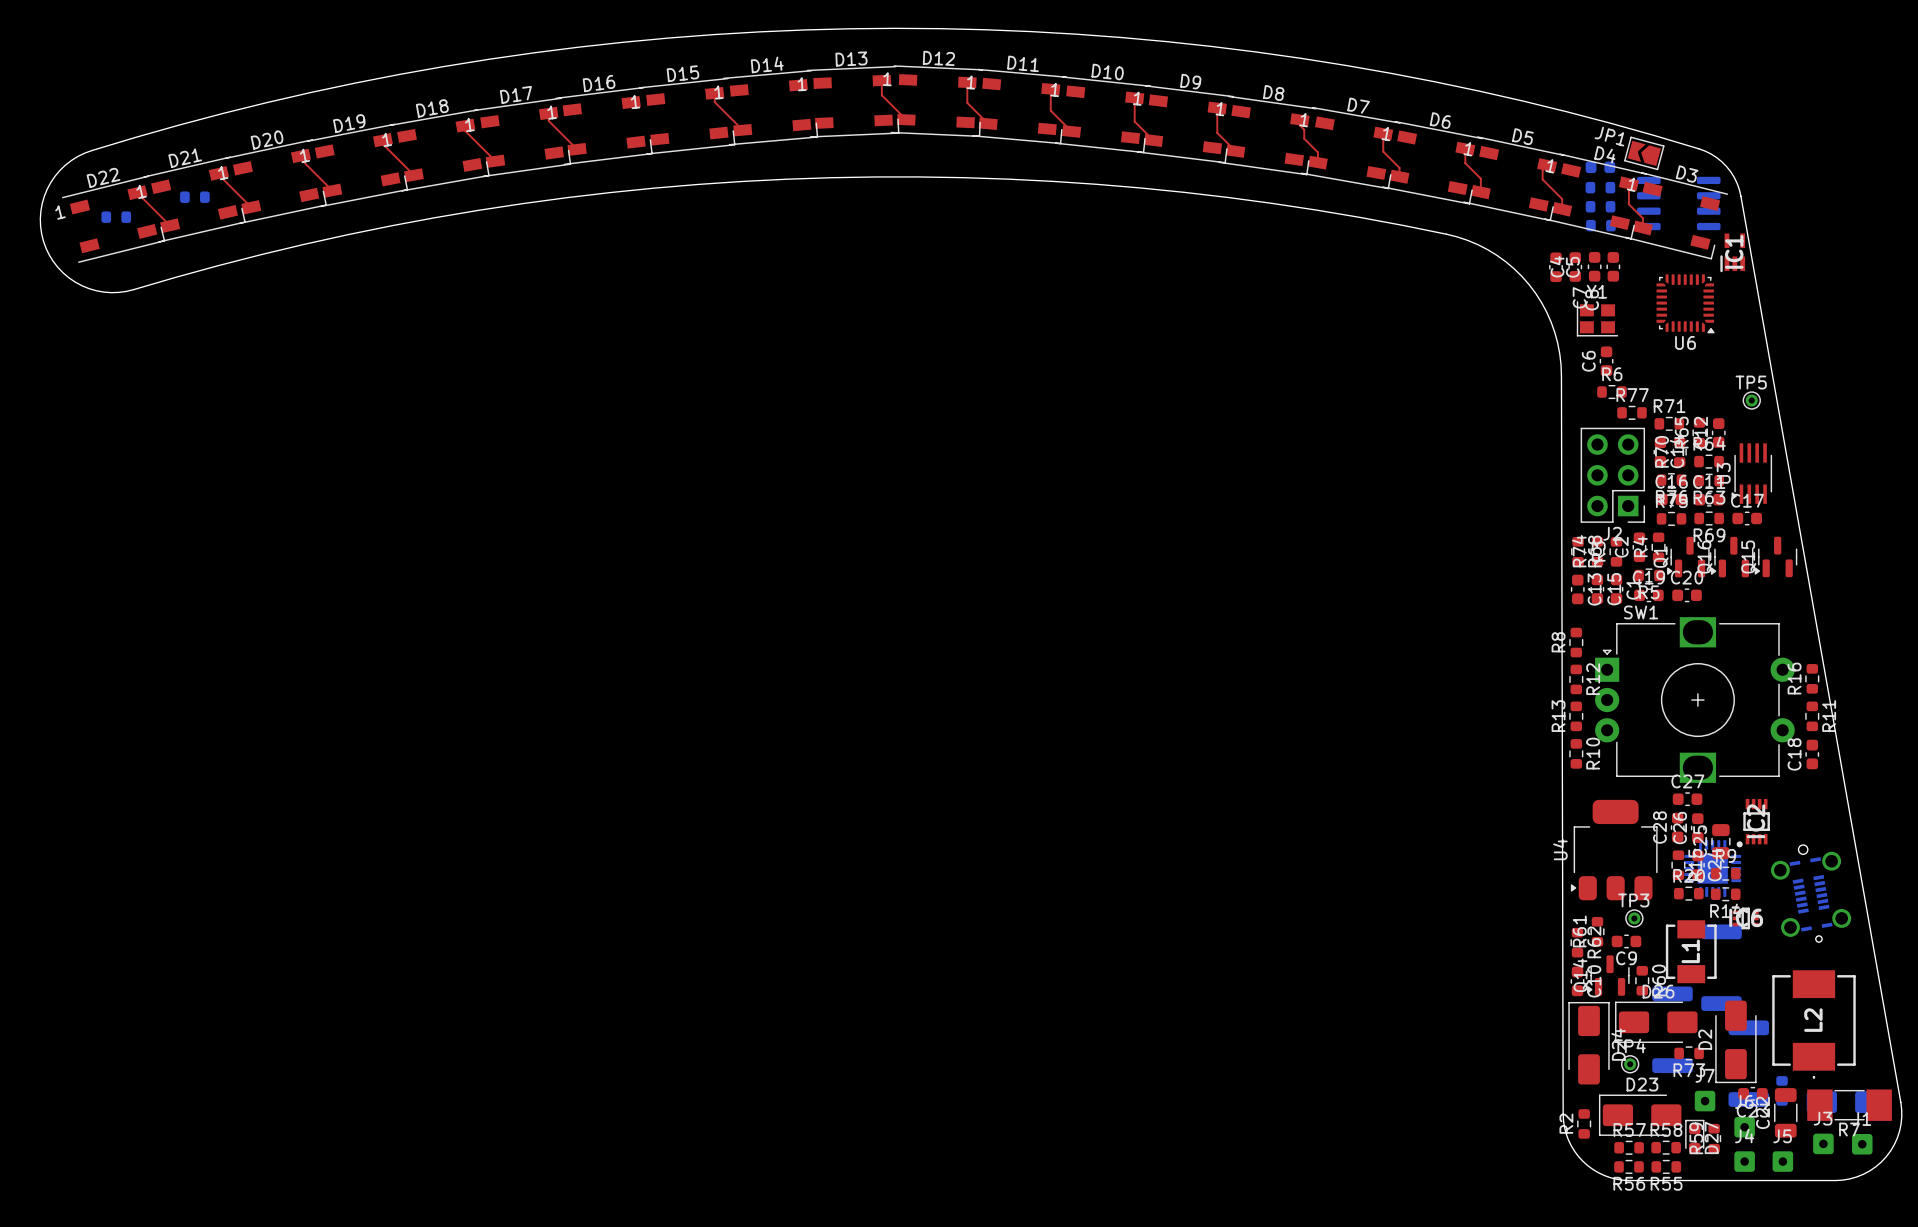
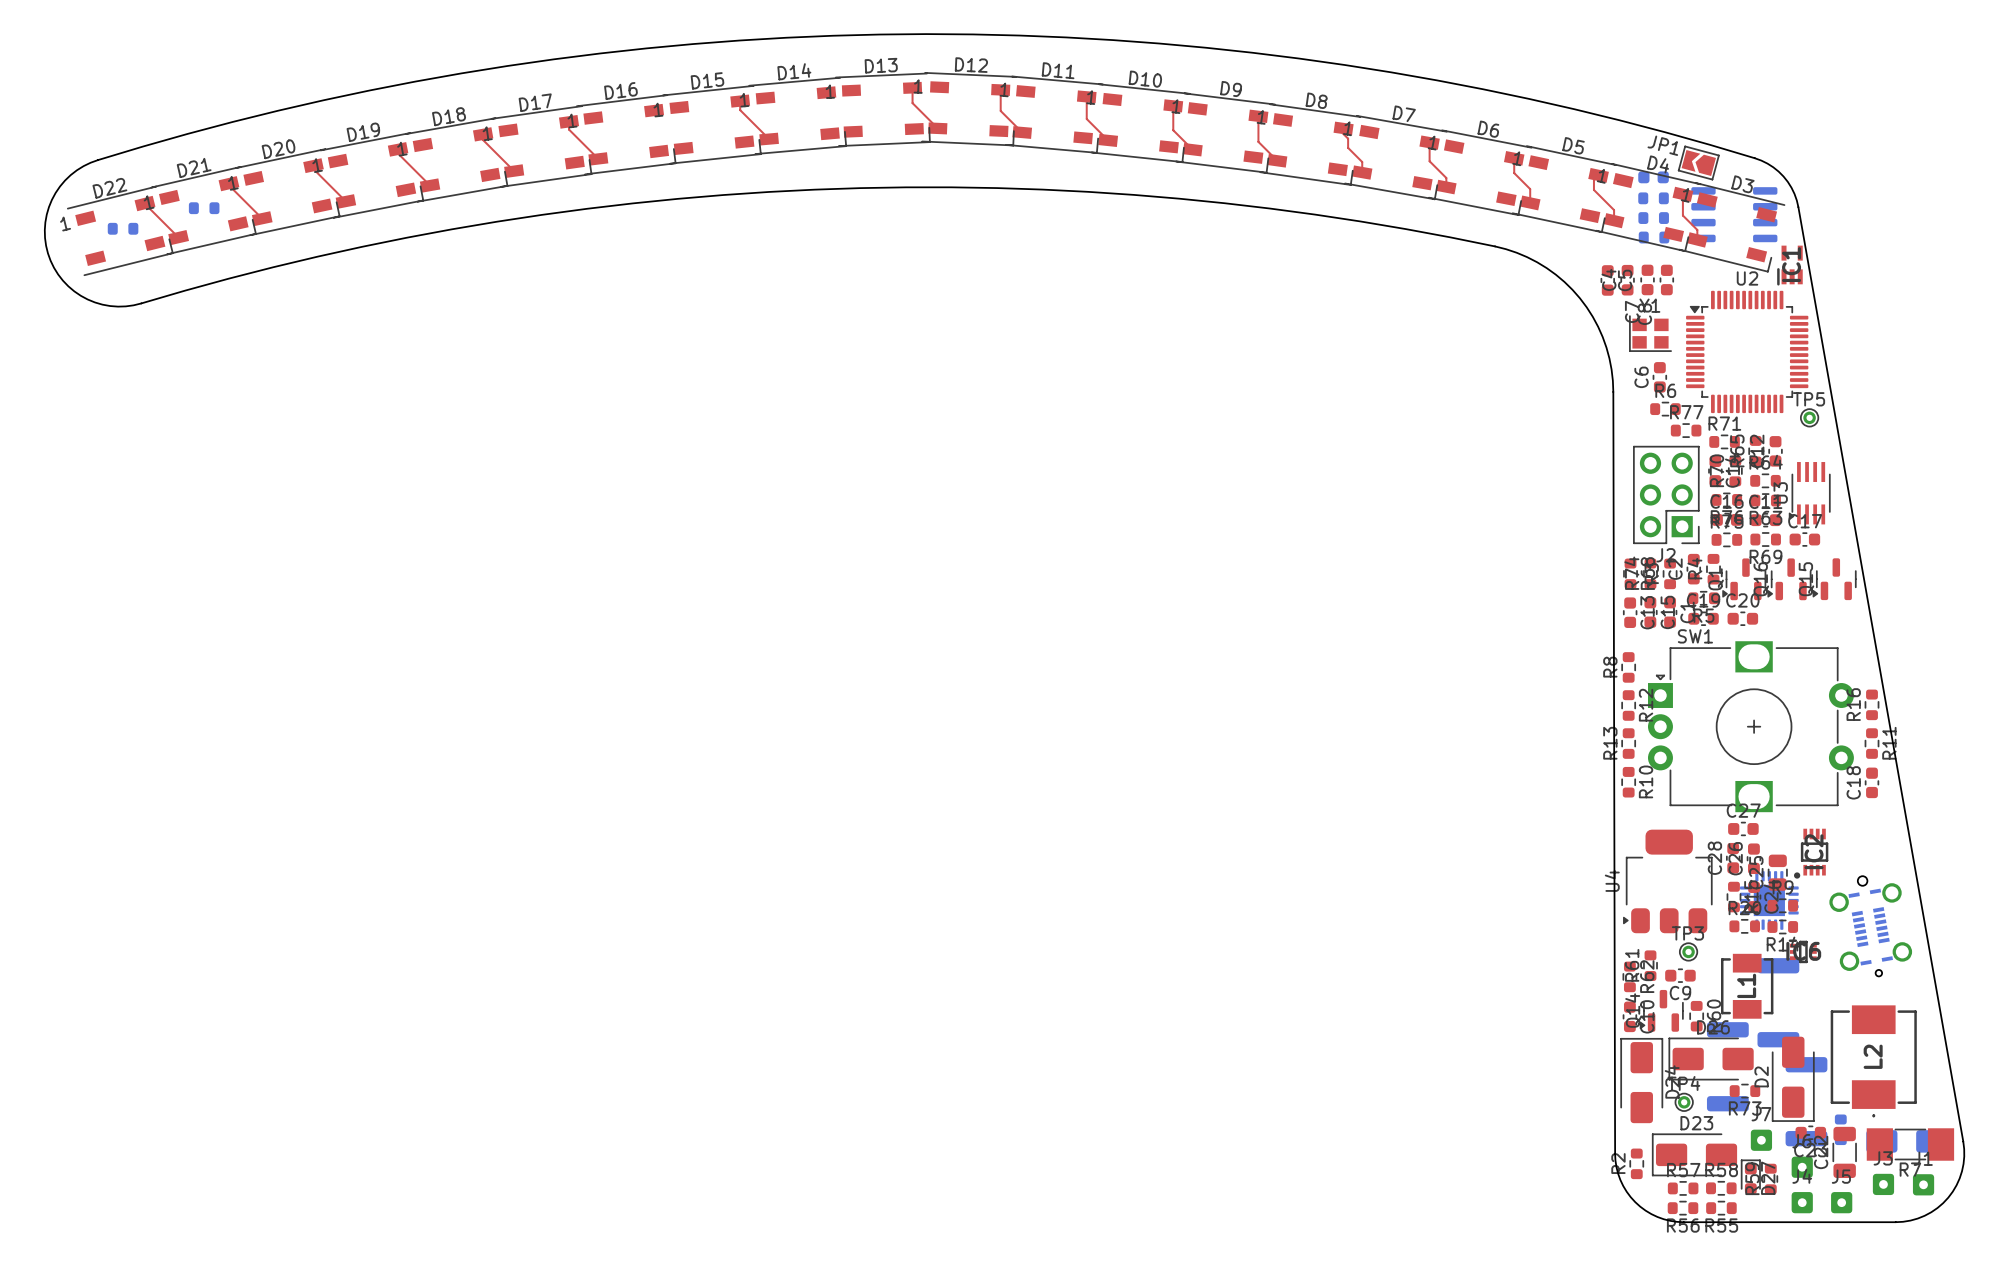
U6: (1685, 303) -> none
U2: none -> (1747, 351)

